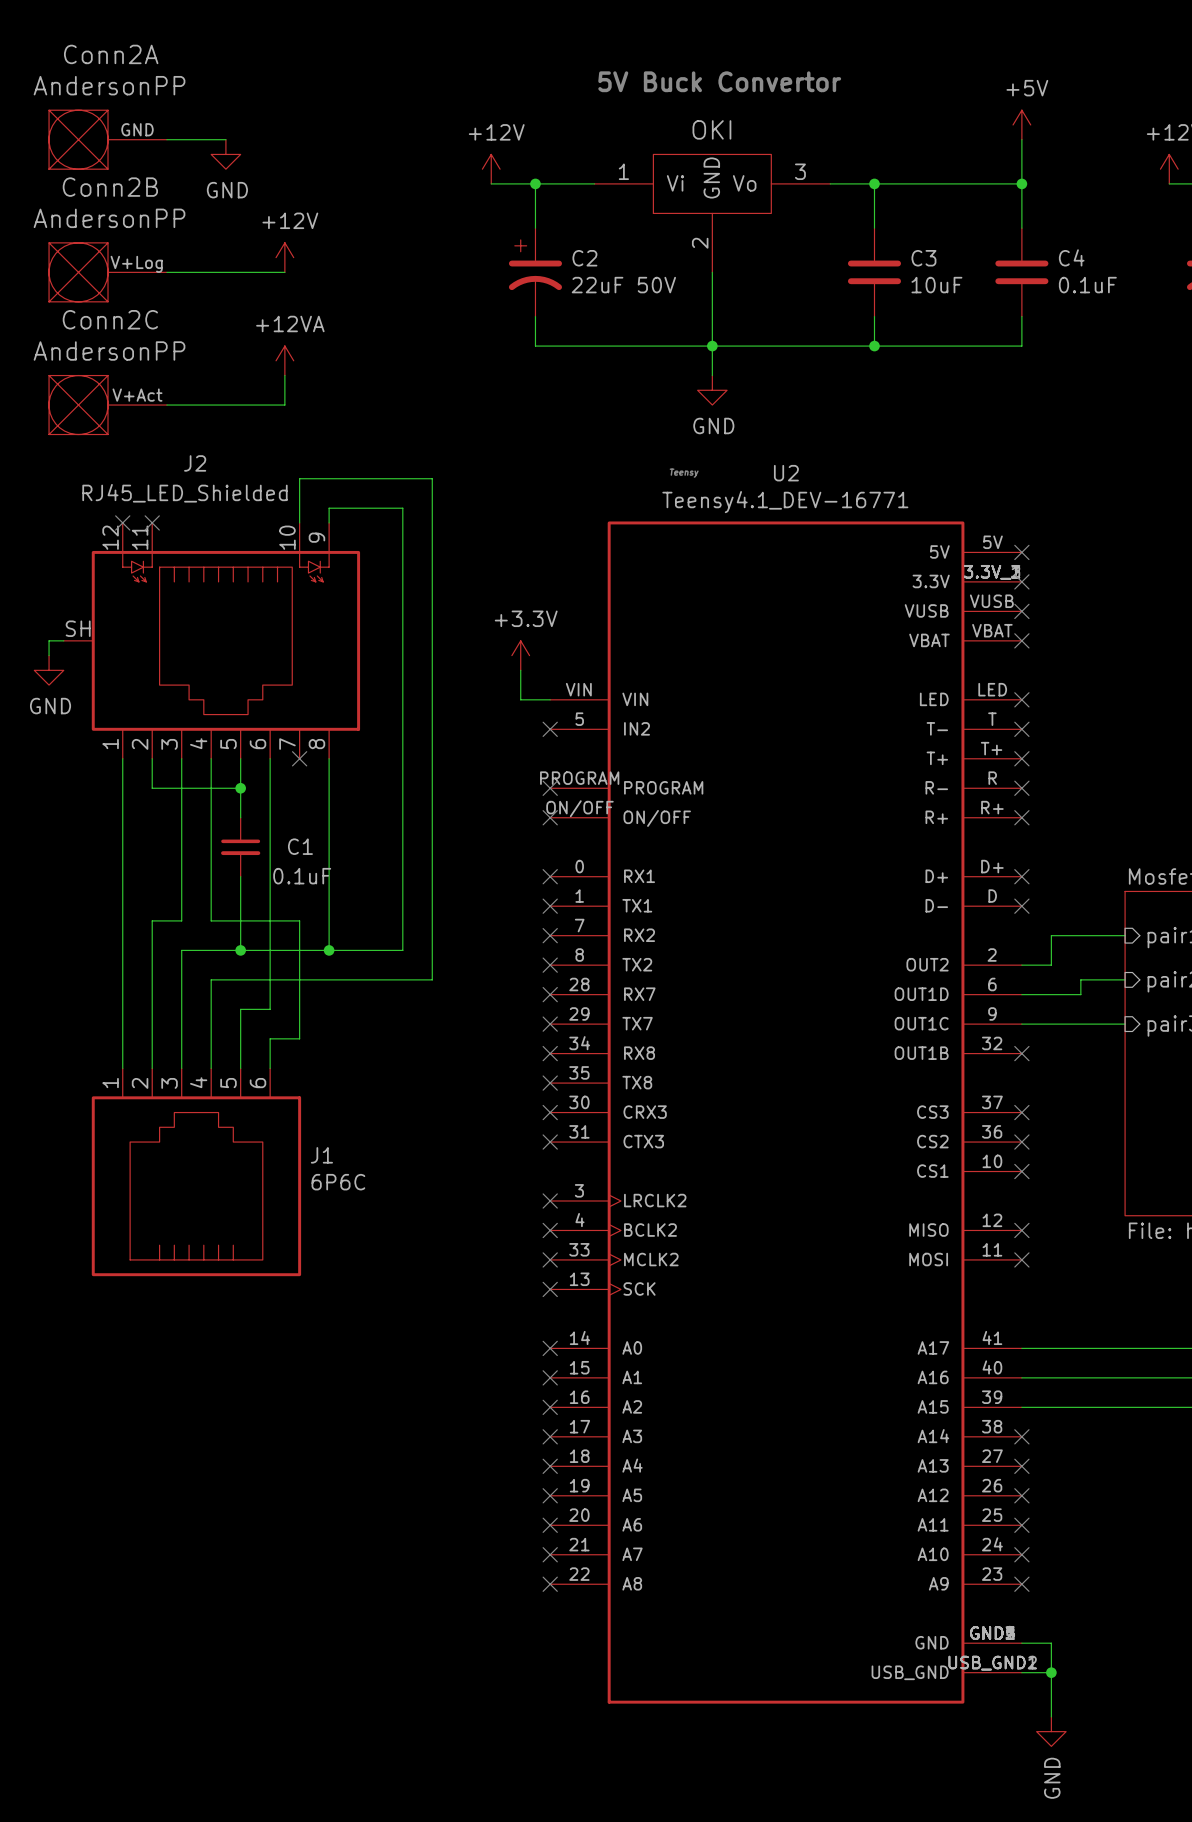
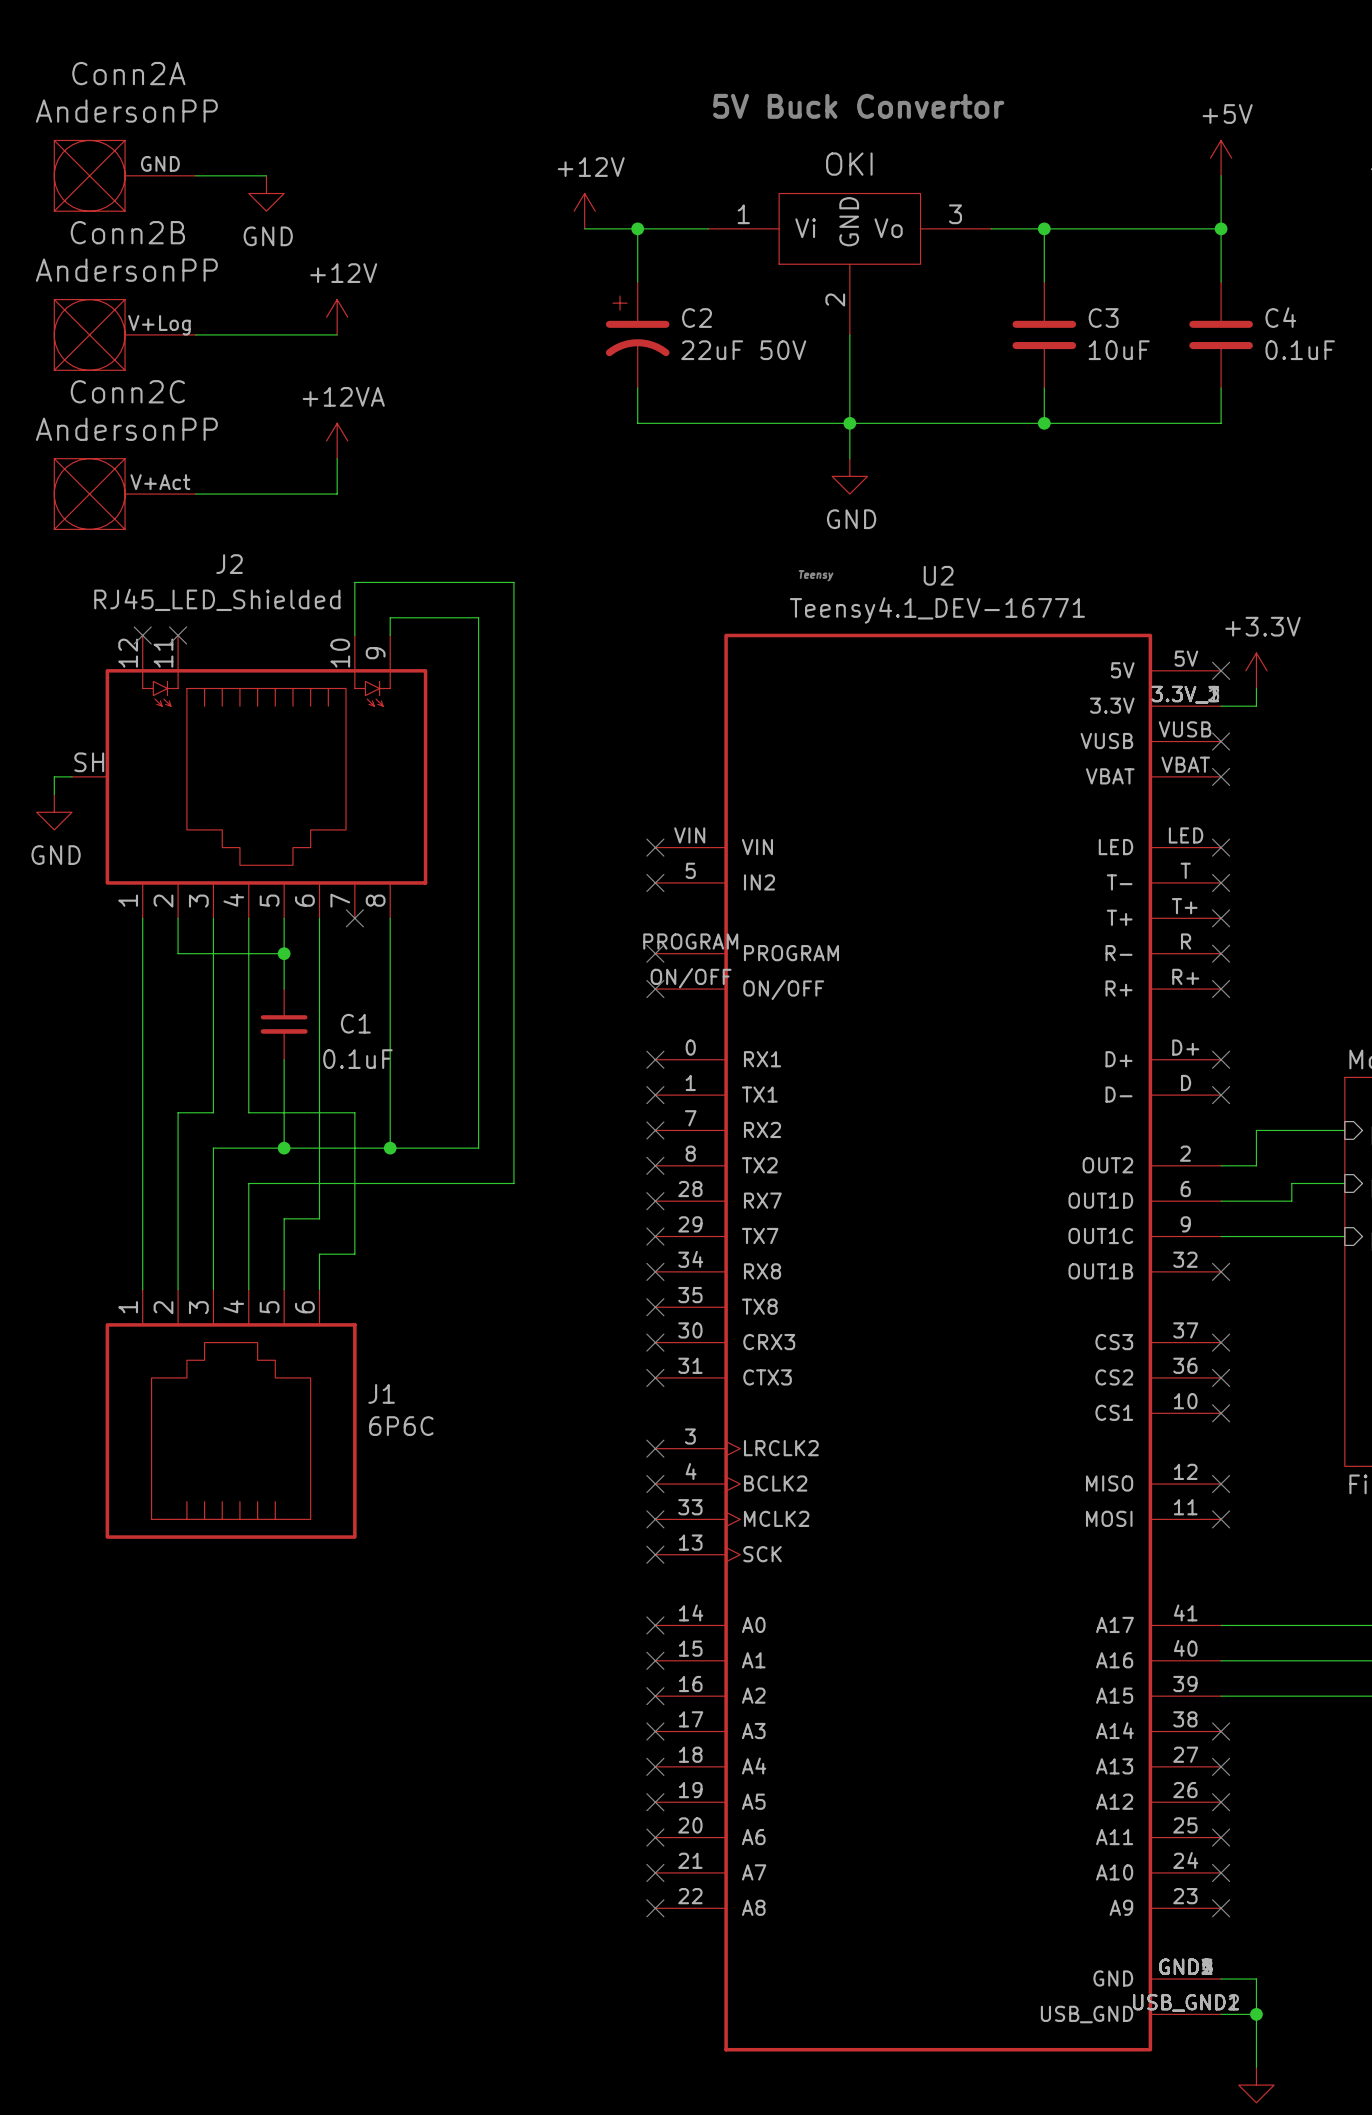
power symbol: none -> +3.3V (1256, 670)
wire: none -> (1256, 688) (1256, 706) (1221, 706)
no-connect mark: (1021, 581) -> none
power symbol: +3.3V (520, 655) -> none
wire: (520, 670) (520, 699) (550, 699) -> none
no-connect mark: none -> (655, 847)

